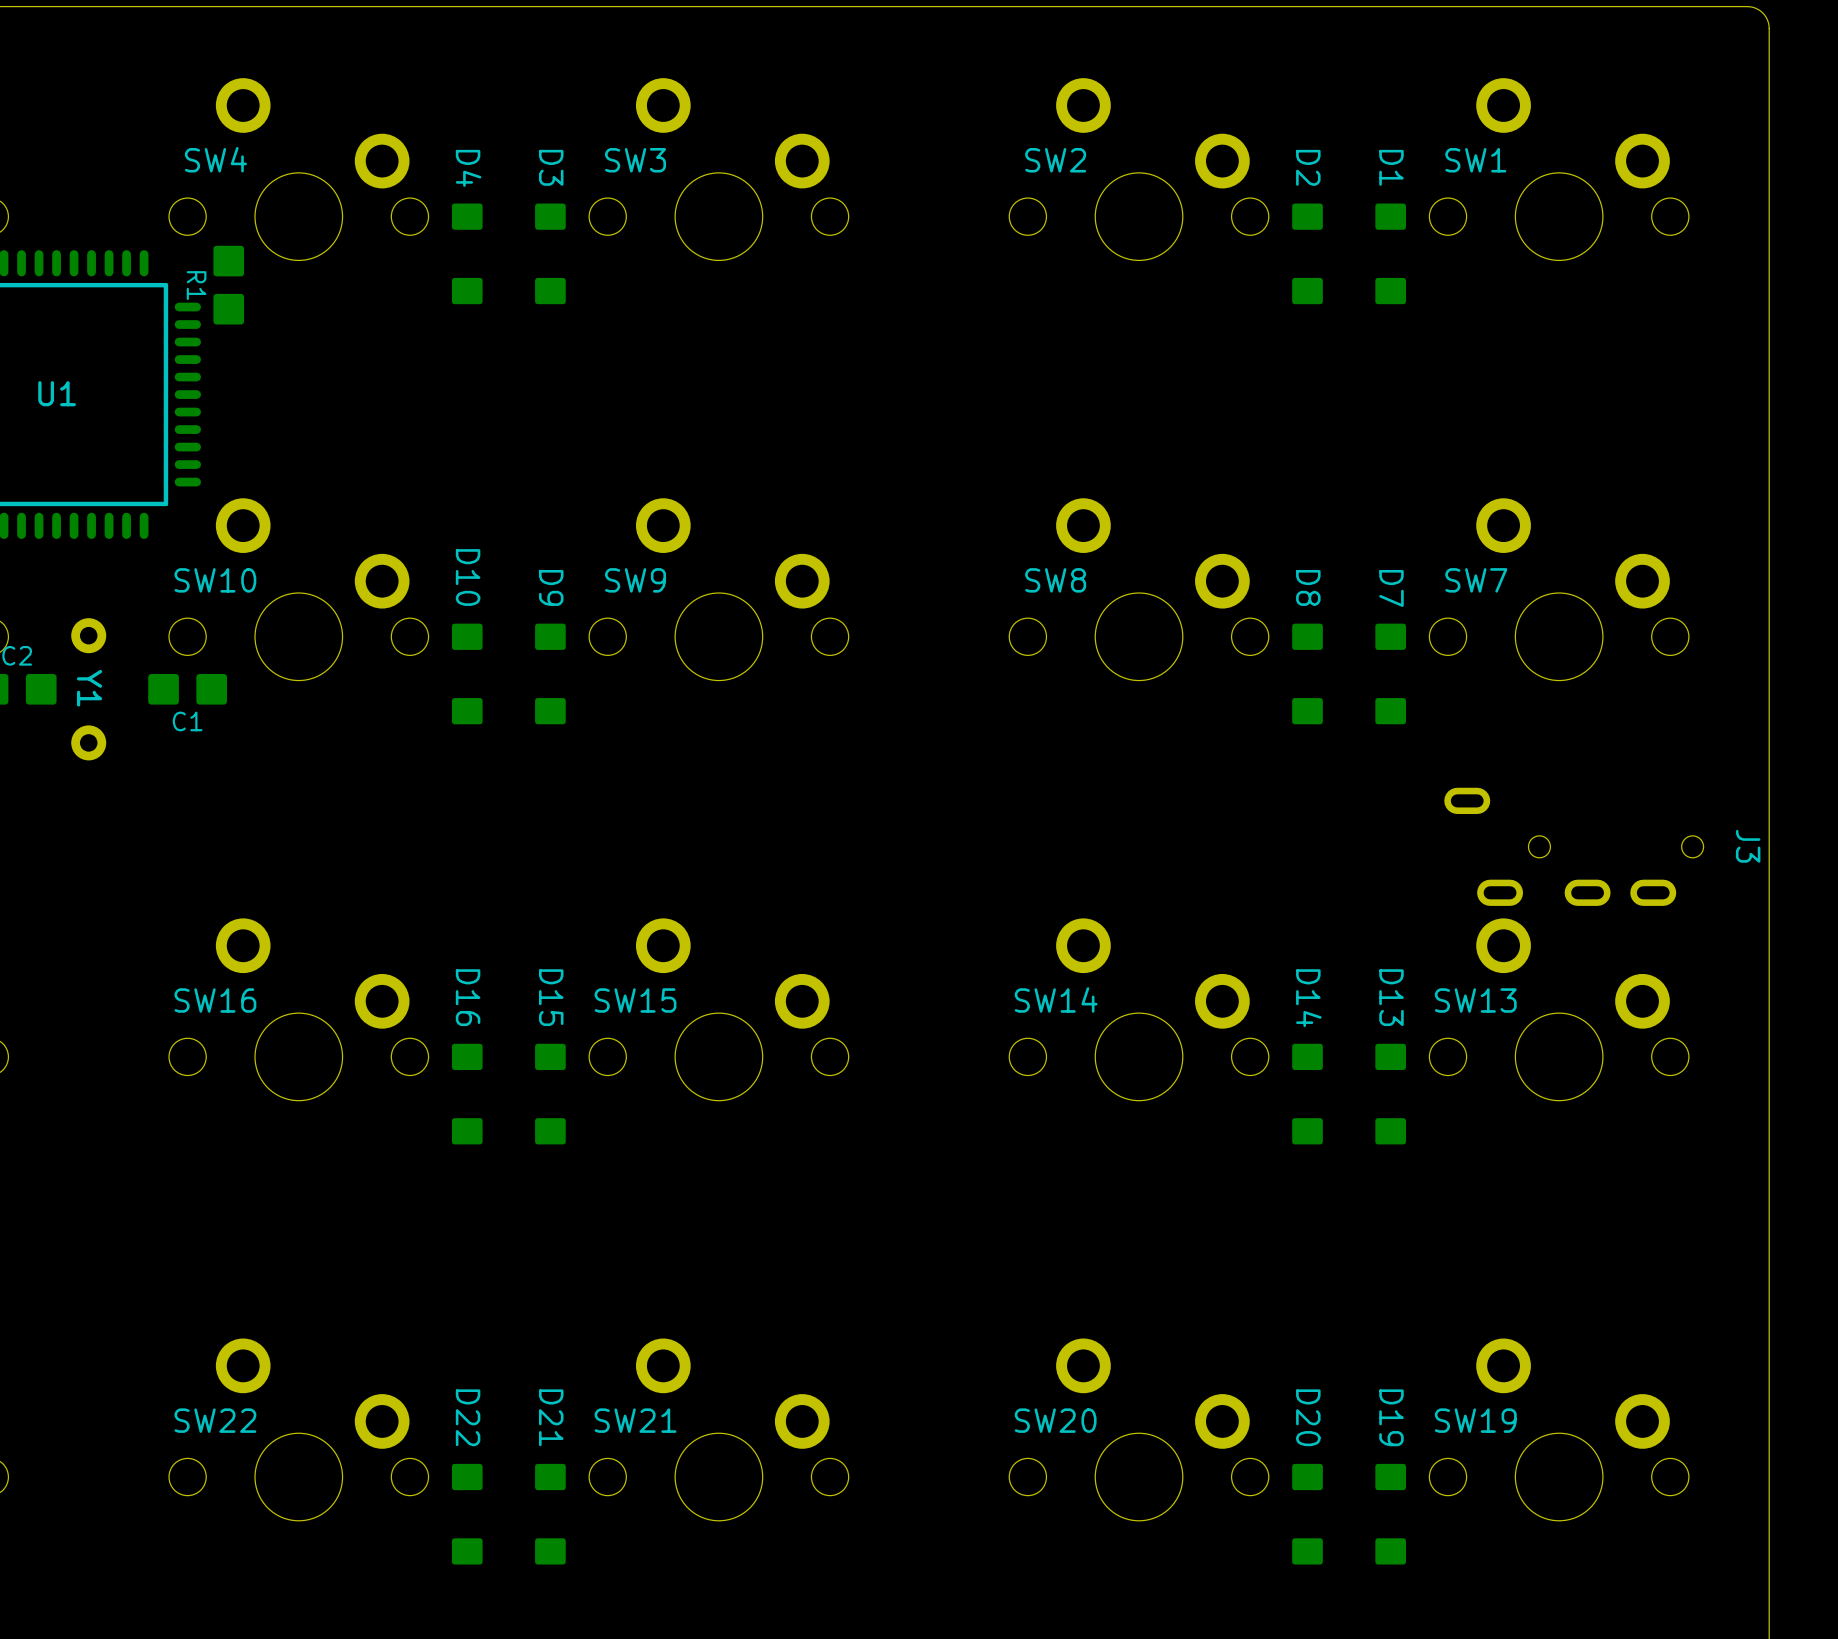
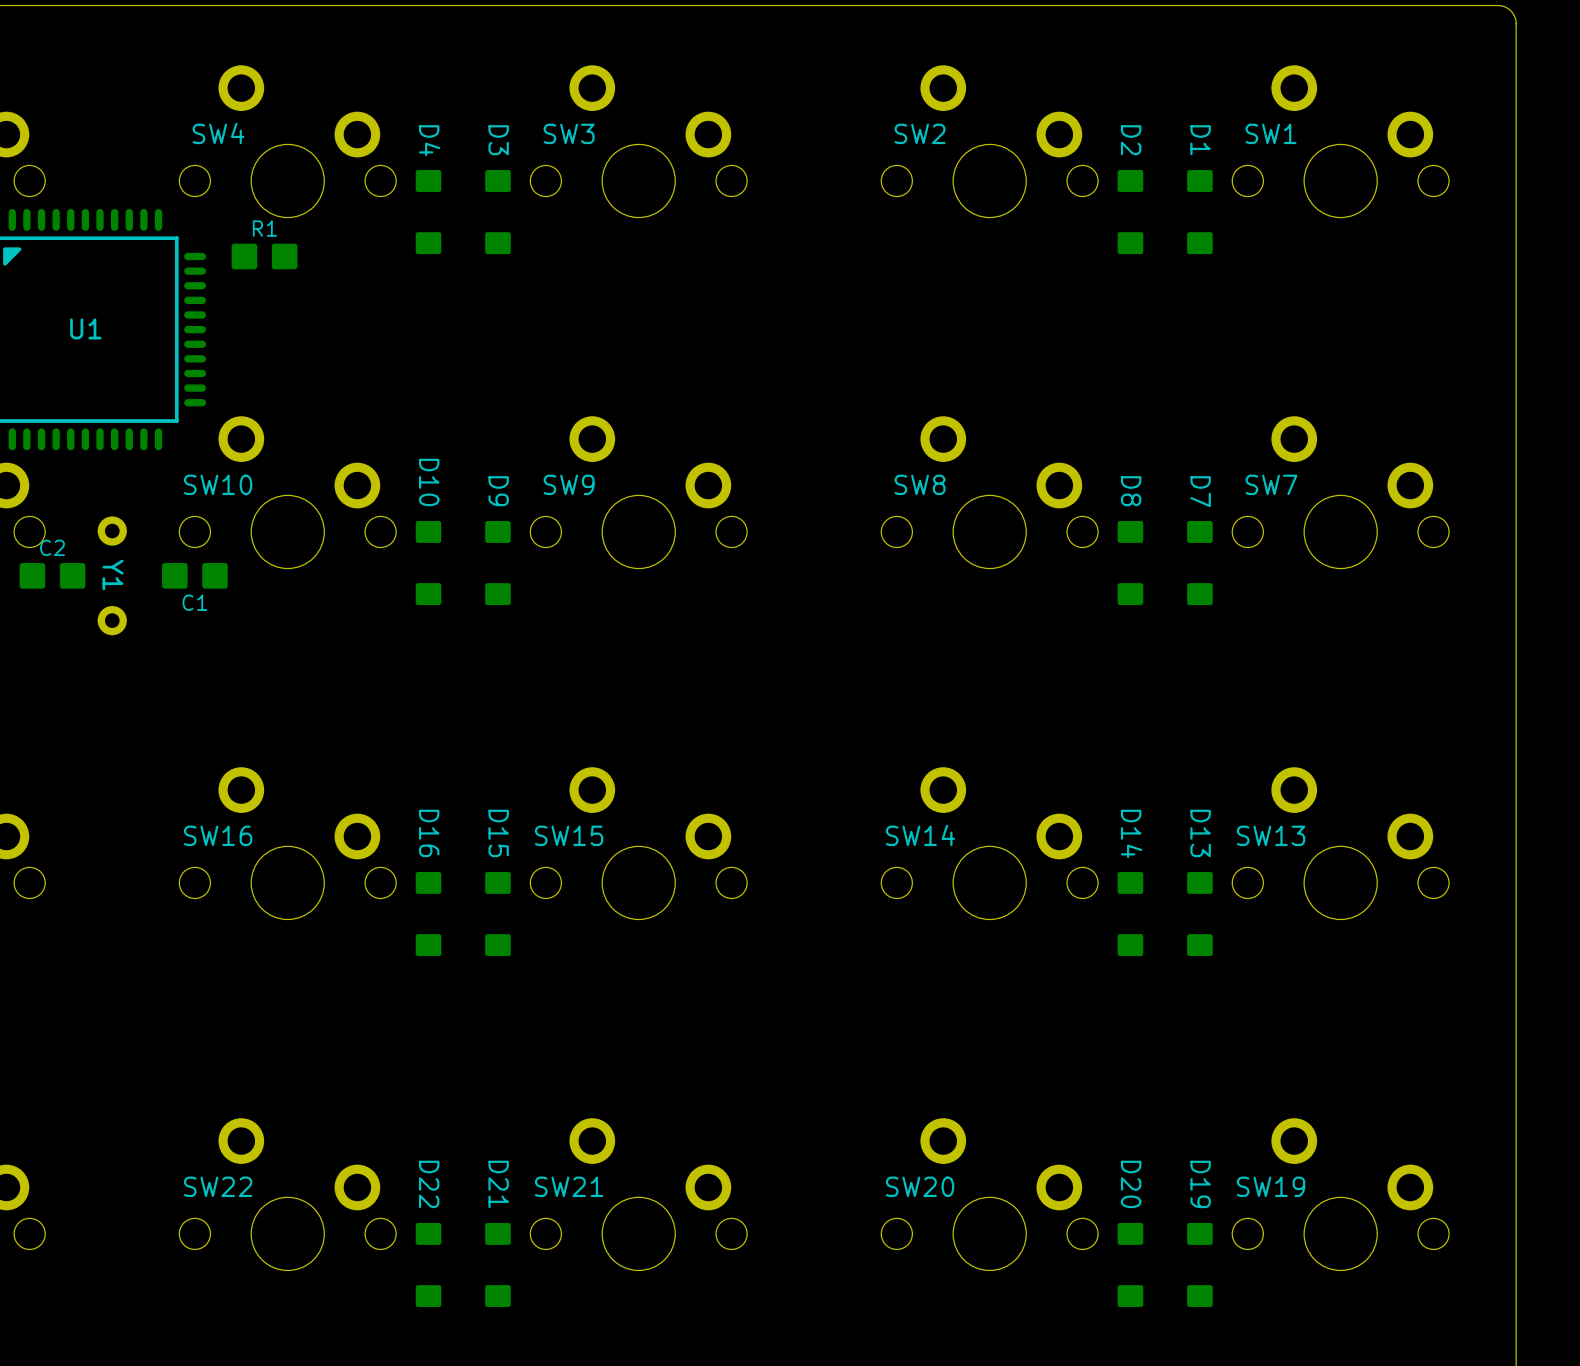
R1 rotation: 0° (228, 285) -> 90° clockwise (264, 256)
R1 position: (228, 285) -> (264, 256)
J3: (1573, 846) -> none

